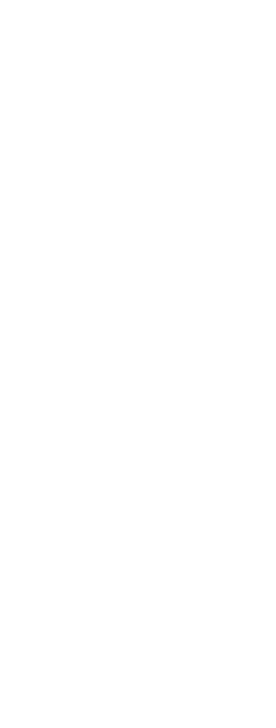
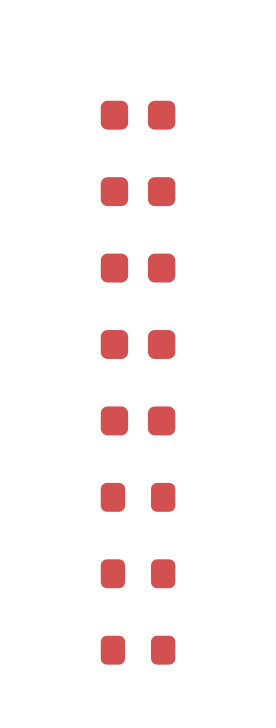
part: none -> (138, 115)
part: none -> (138, 191)
part: none -> (138, 268)
part: none -> (138, 344)
part: none -> (138, 420)
part: none -> (138, 497)
part: none -> (138, 573)
part: none -> (138, 650)

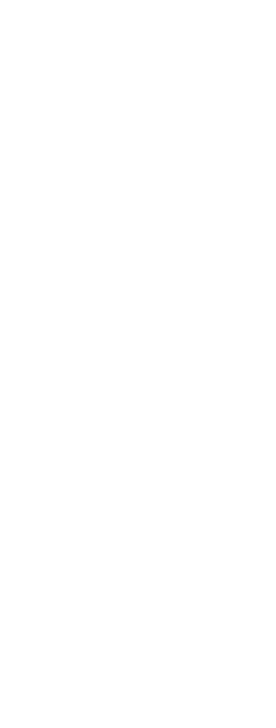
part: (138, 115) -> none
part: (138, 191) -> none
part: (138, 268) -> none
part: (138, 344) -> none
part: (138, 420) -> none
part: (138, 497) -> none
part: (138, 573) -> none
part: (138, 650) -> none

